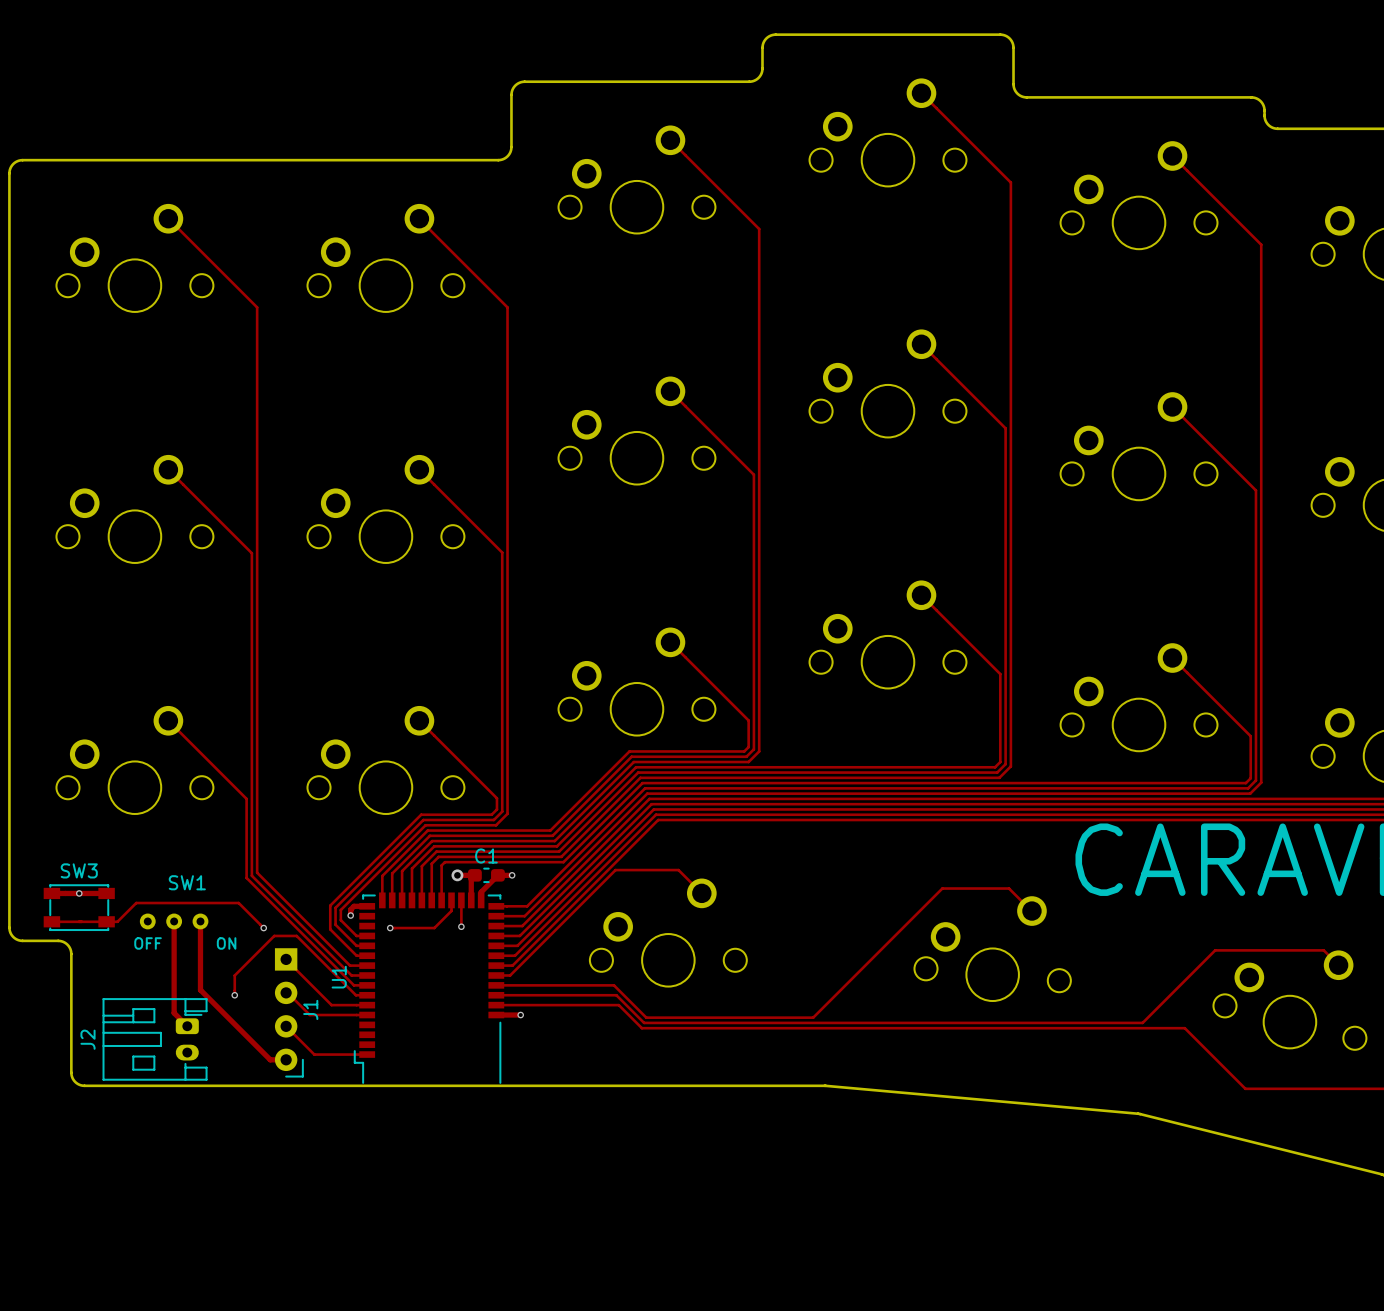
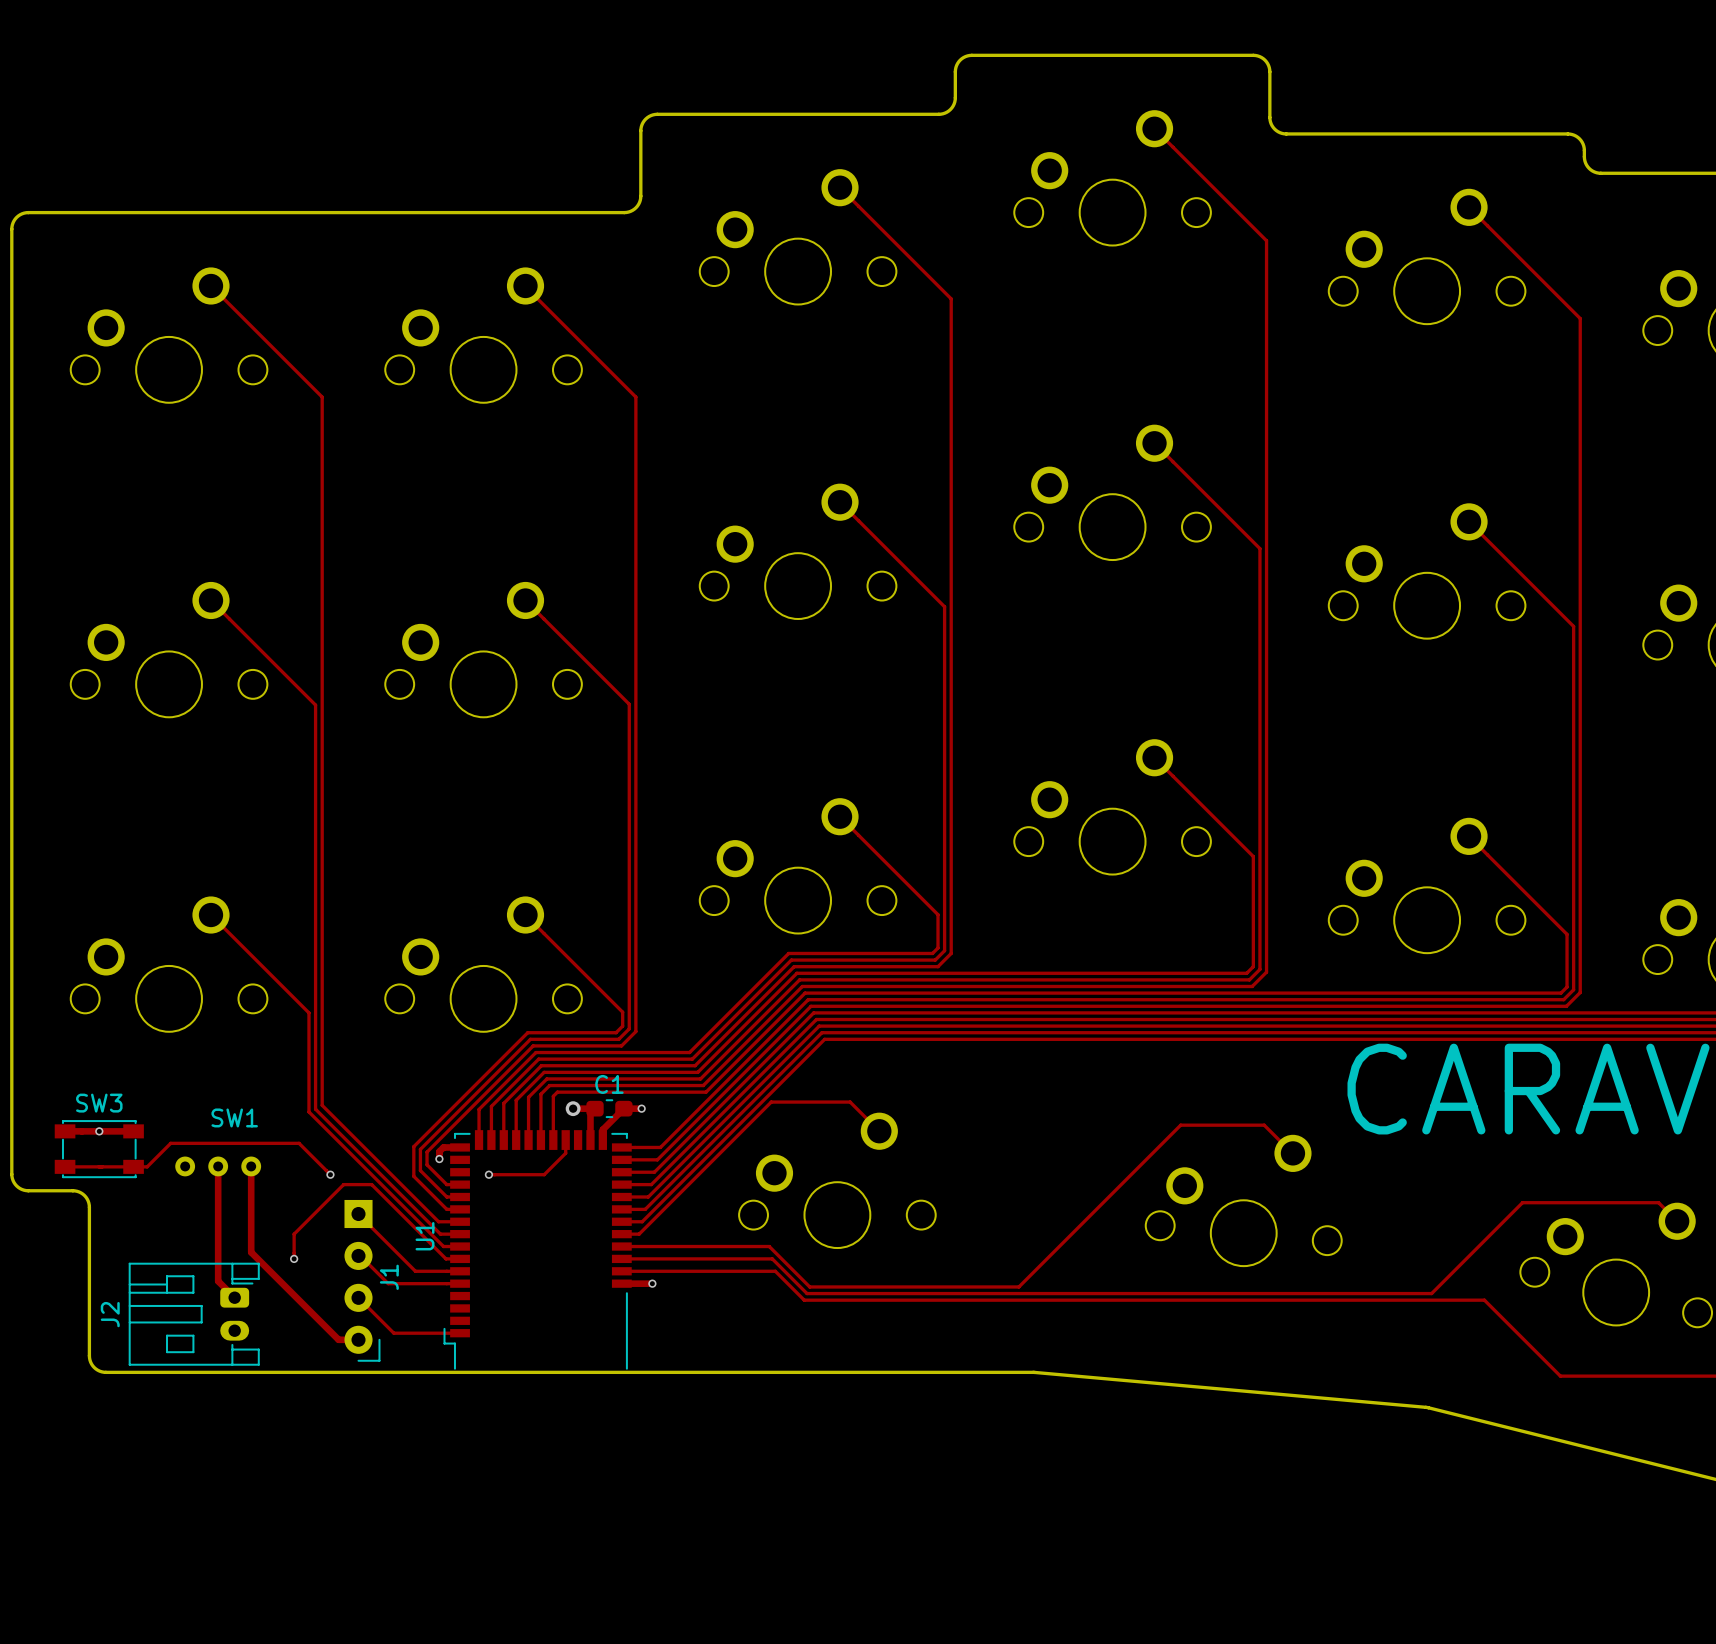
track: (461, 900) (461, 926) -> none
via: (461, 926) -> none
text: OFF (148, 943) -> none
text: ON (226, 943) -> none

